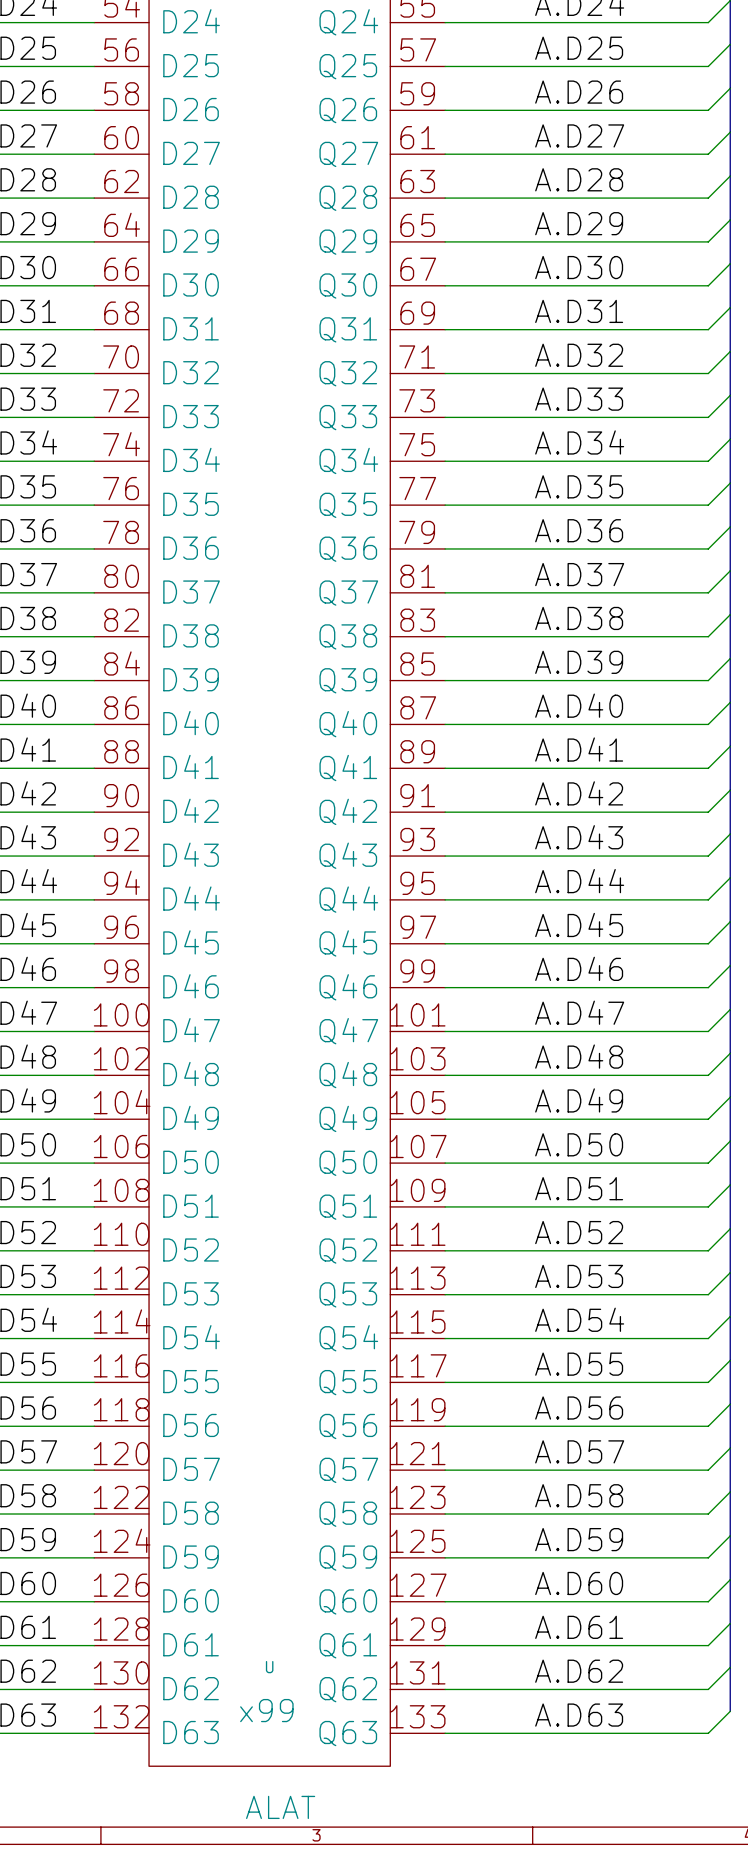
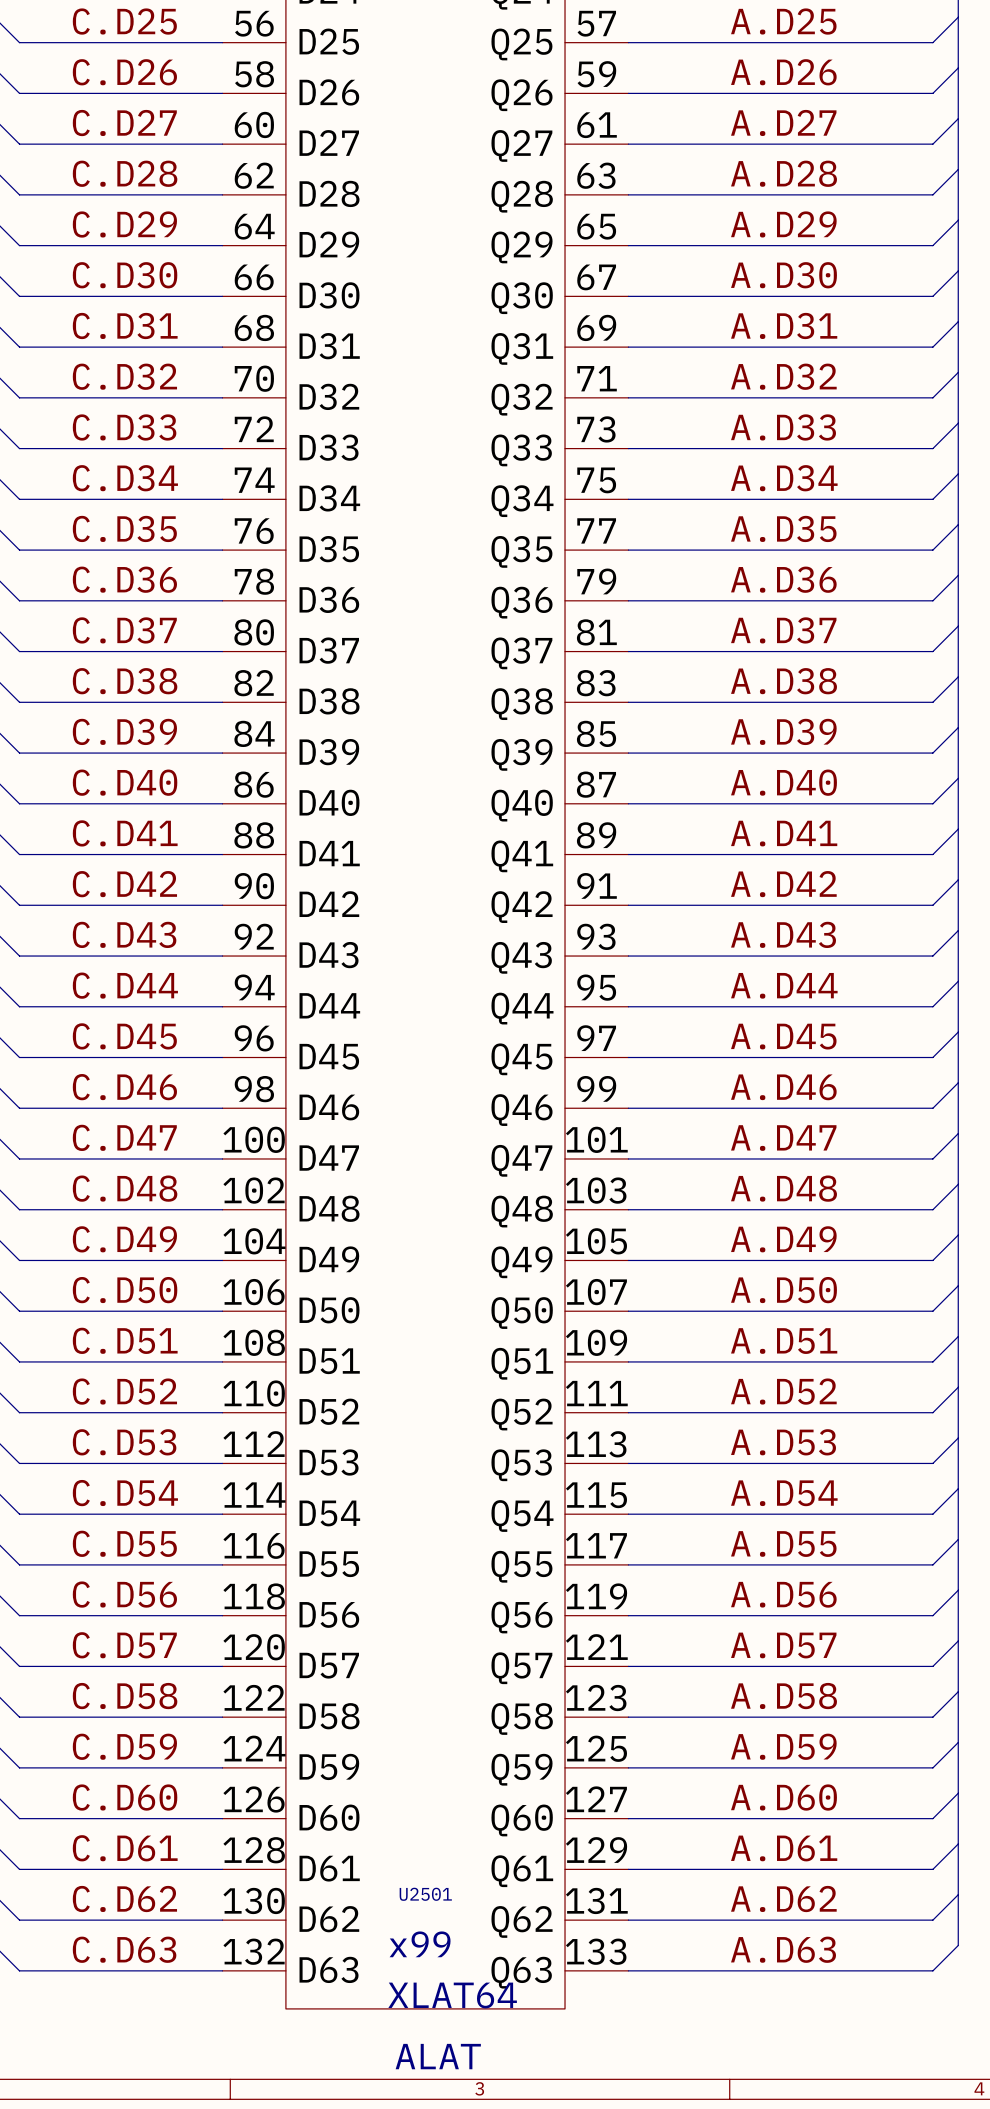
U name: U (269, 1667) -> U2501 (425, 1894)
U value: none -> XLAT64 (452, 1995)

